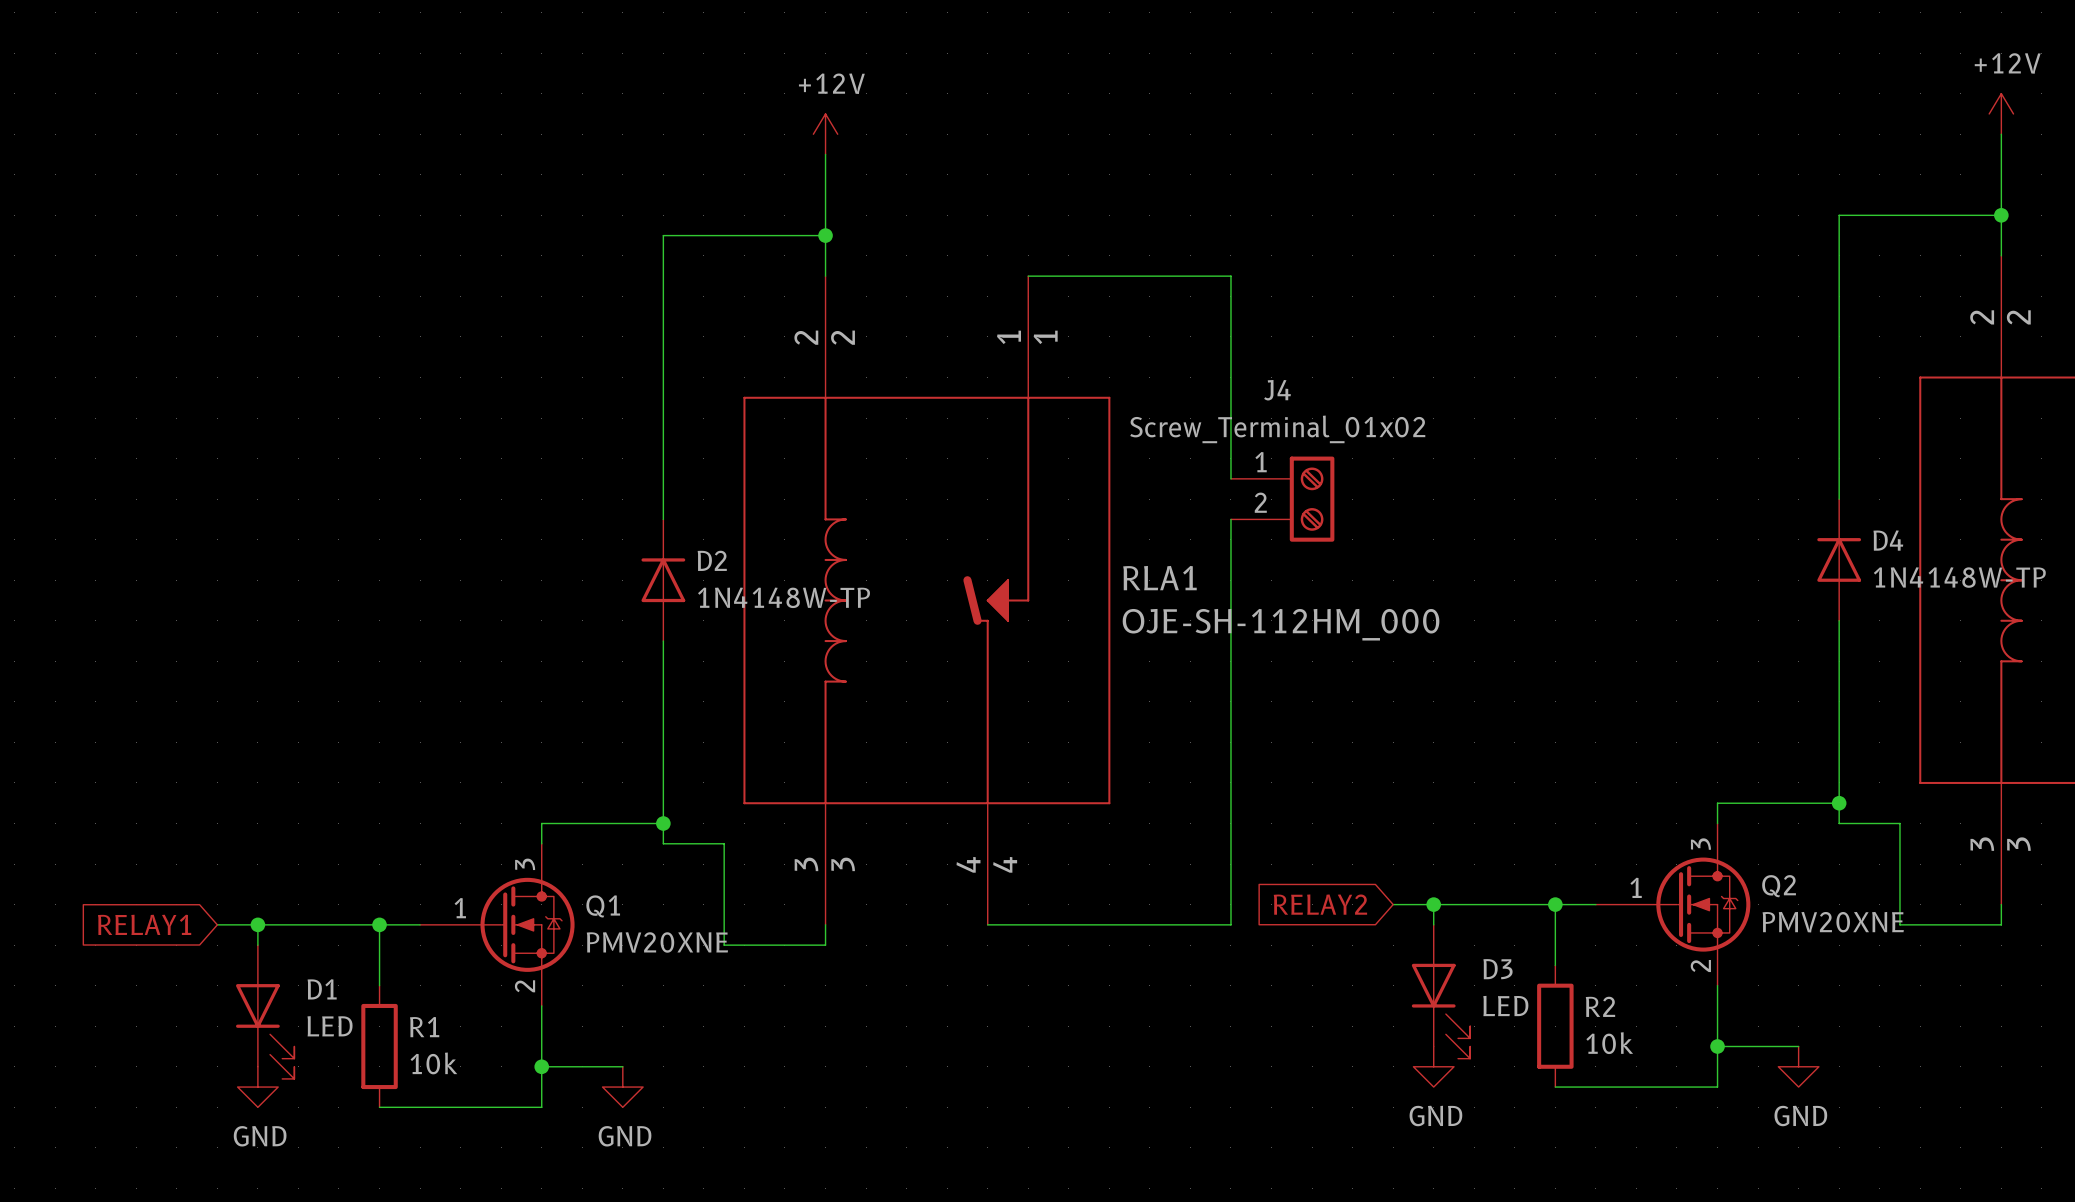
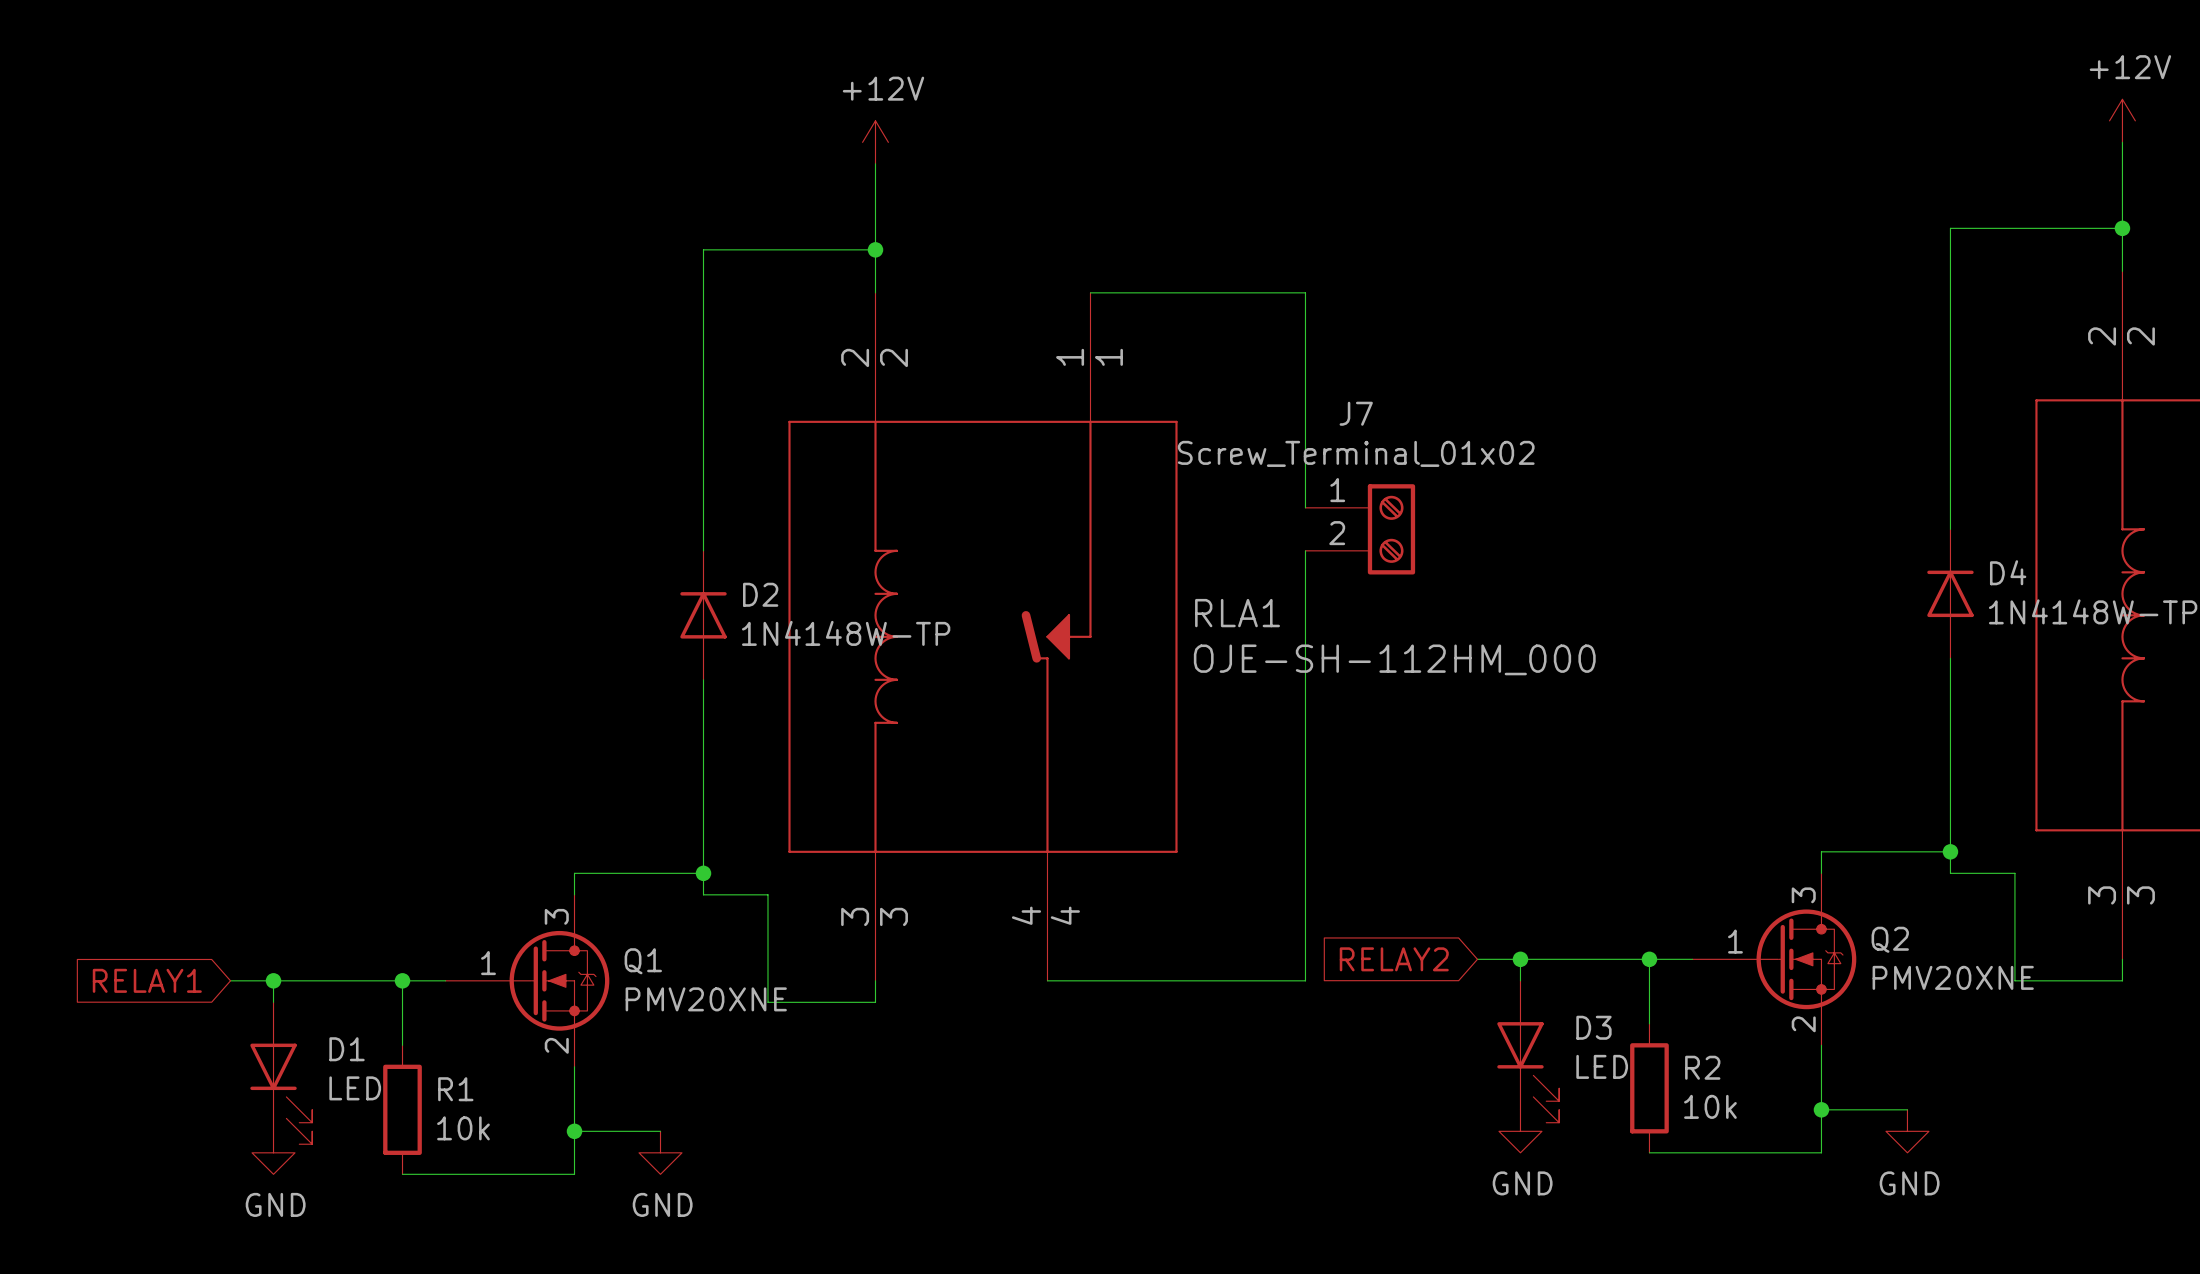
J4 name: J4 (1277, 390) -> J7 (1356, 413)

